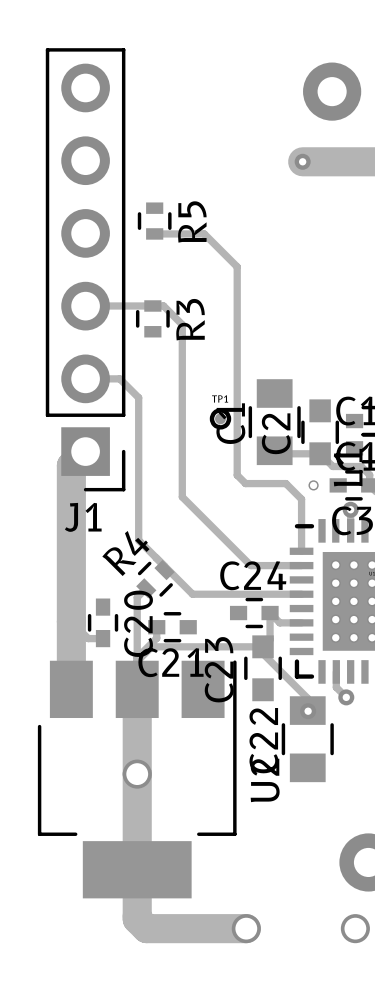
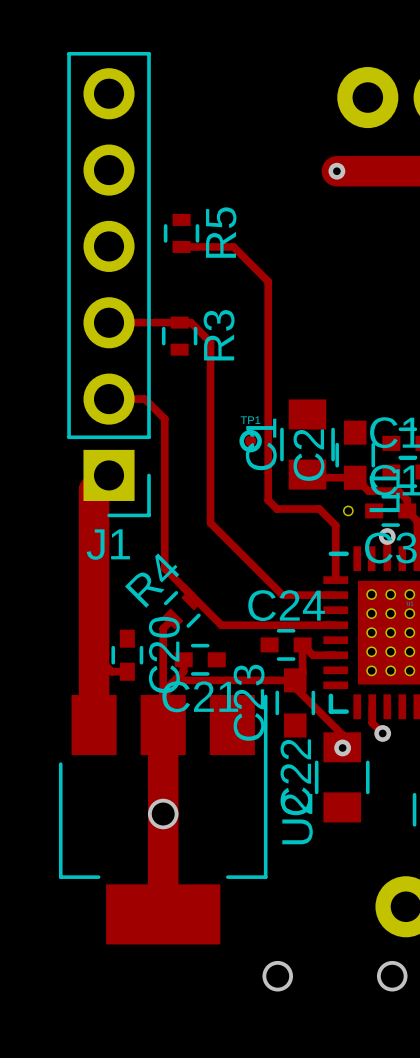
track: (137, 869) (137, 919) (146, 928) (246, 928) -> none

